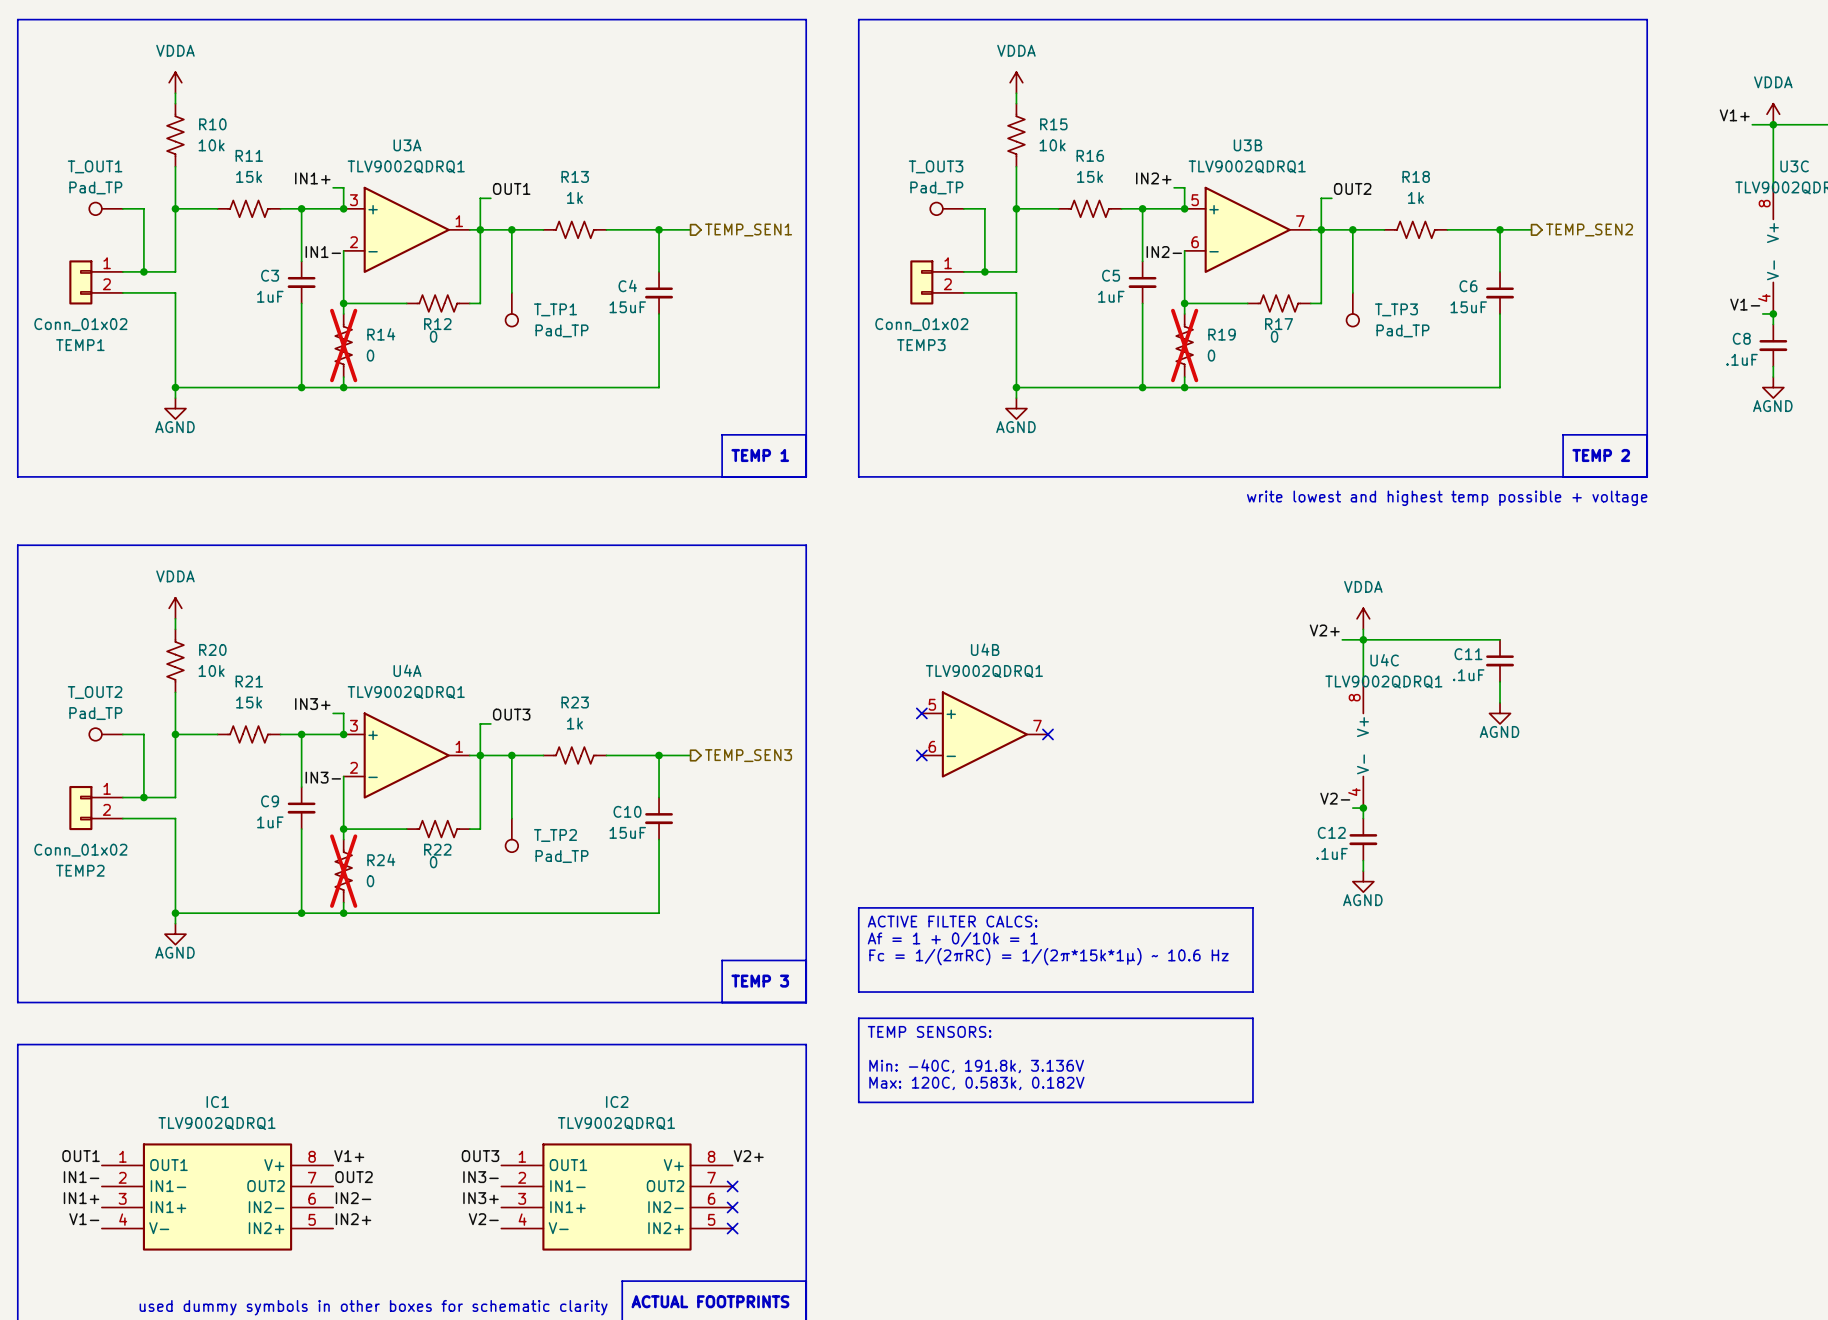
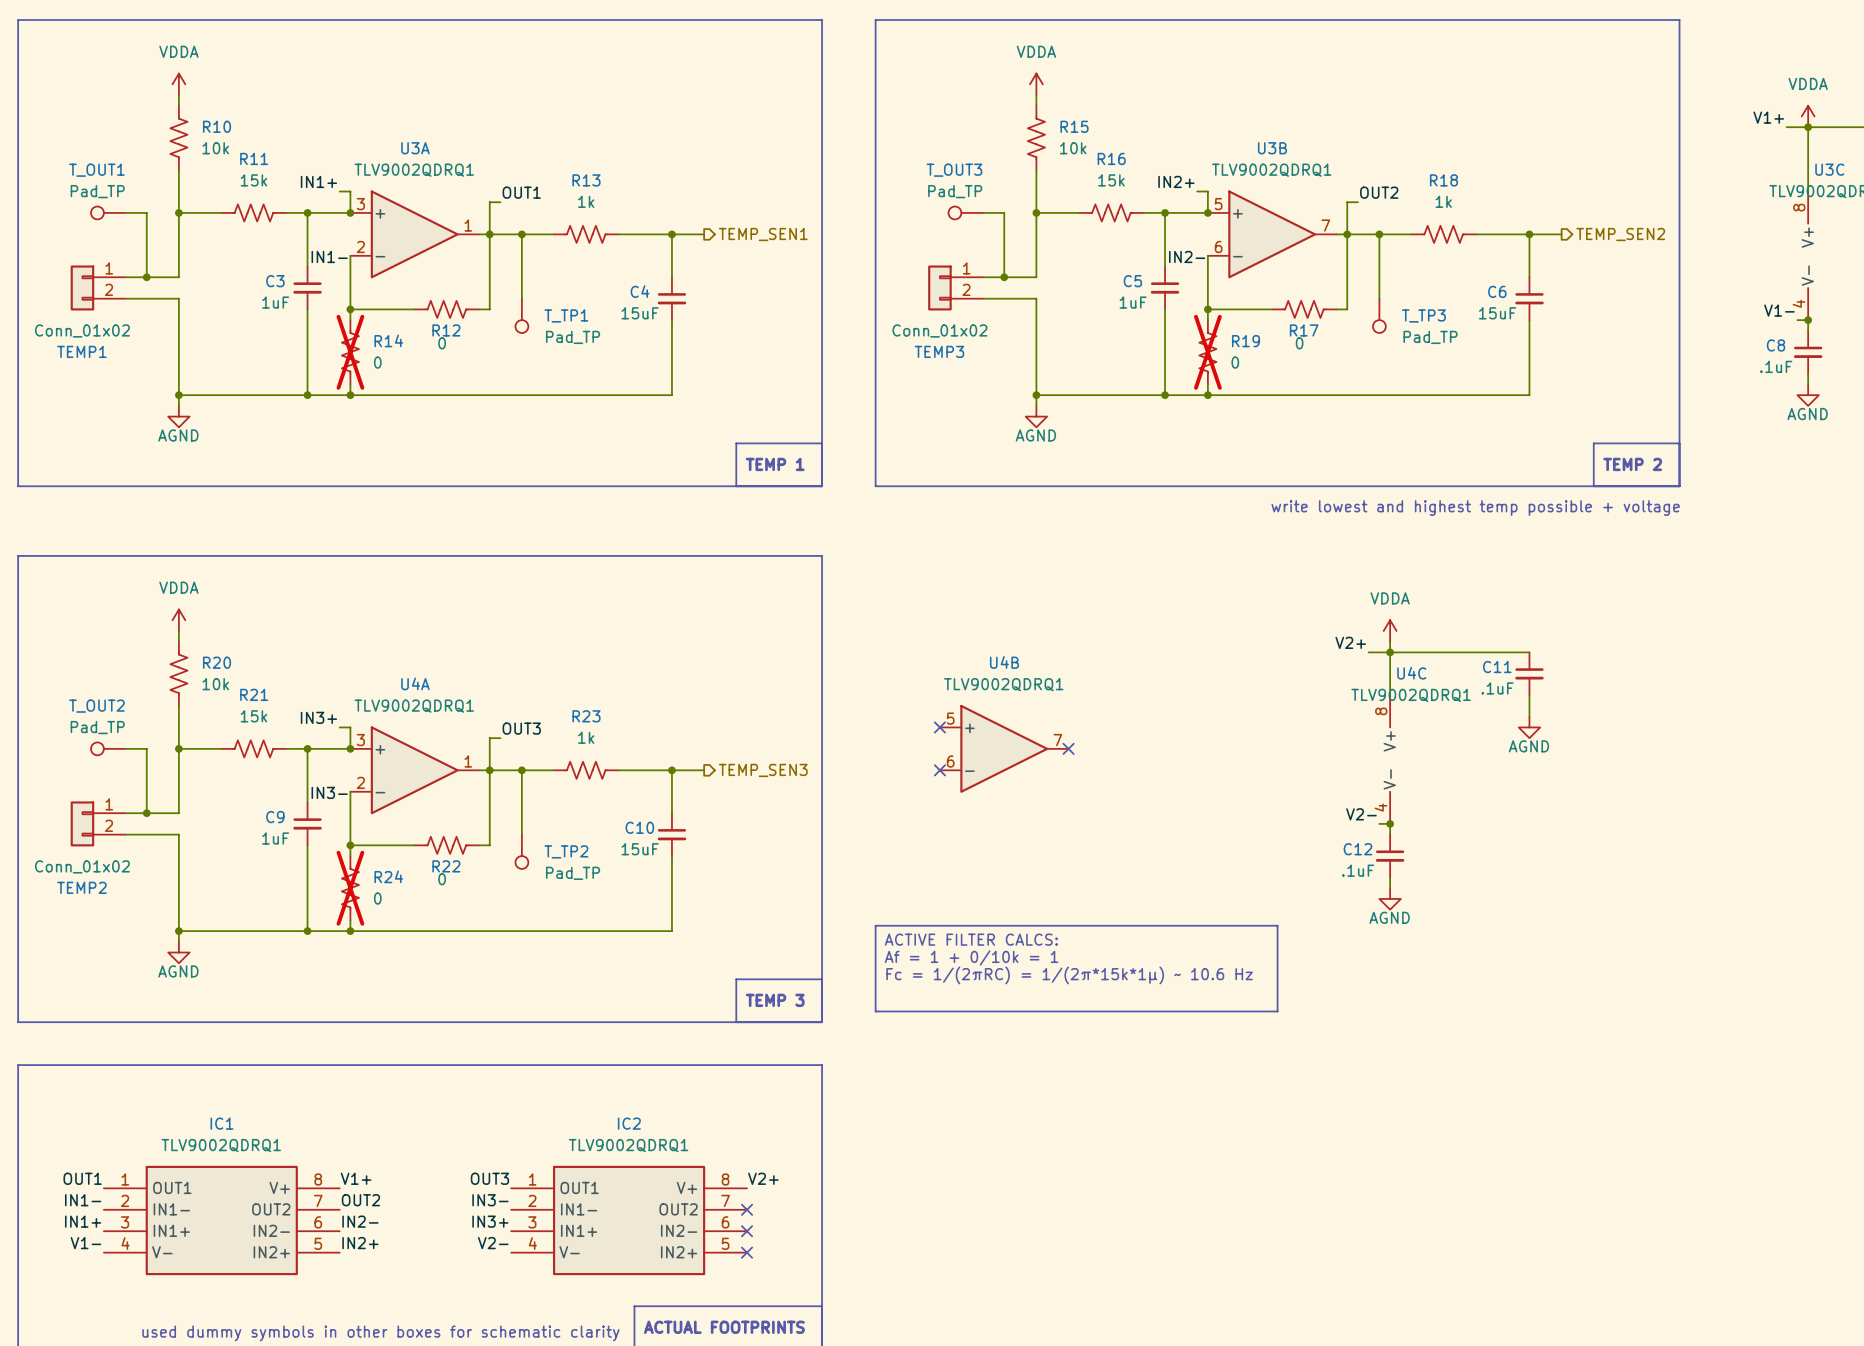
line: (858, 1018) (1252, 1018) (1252, 1102) (858, 1102) (858, 1018) -> none
text: TEMP SENSORS: (929, 1031) -> none
text: Min: -40C, 191.8k, 3.136V (976, 1066) -> none
text: Max: 120C, 0.583k, 0.182V (976, 1083) -> none

